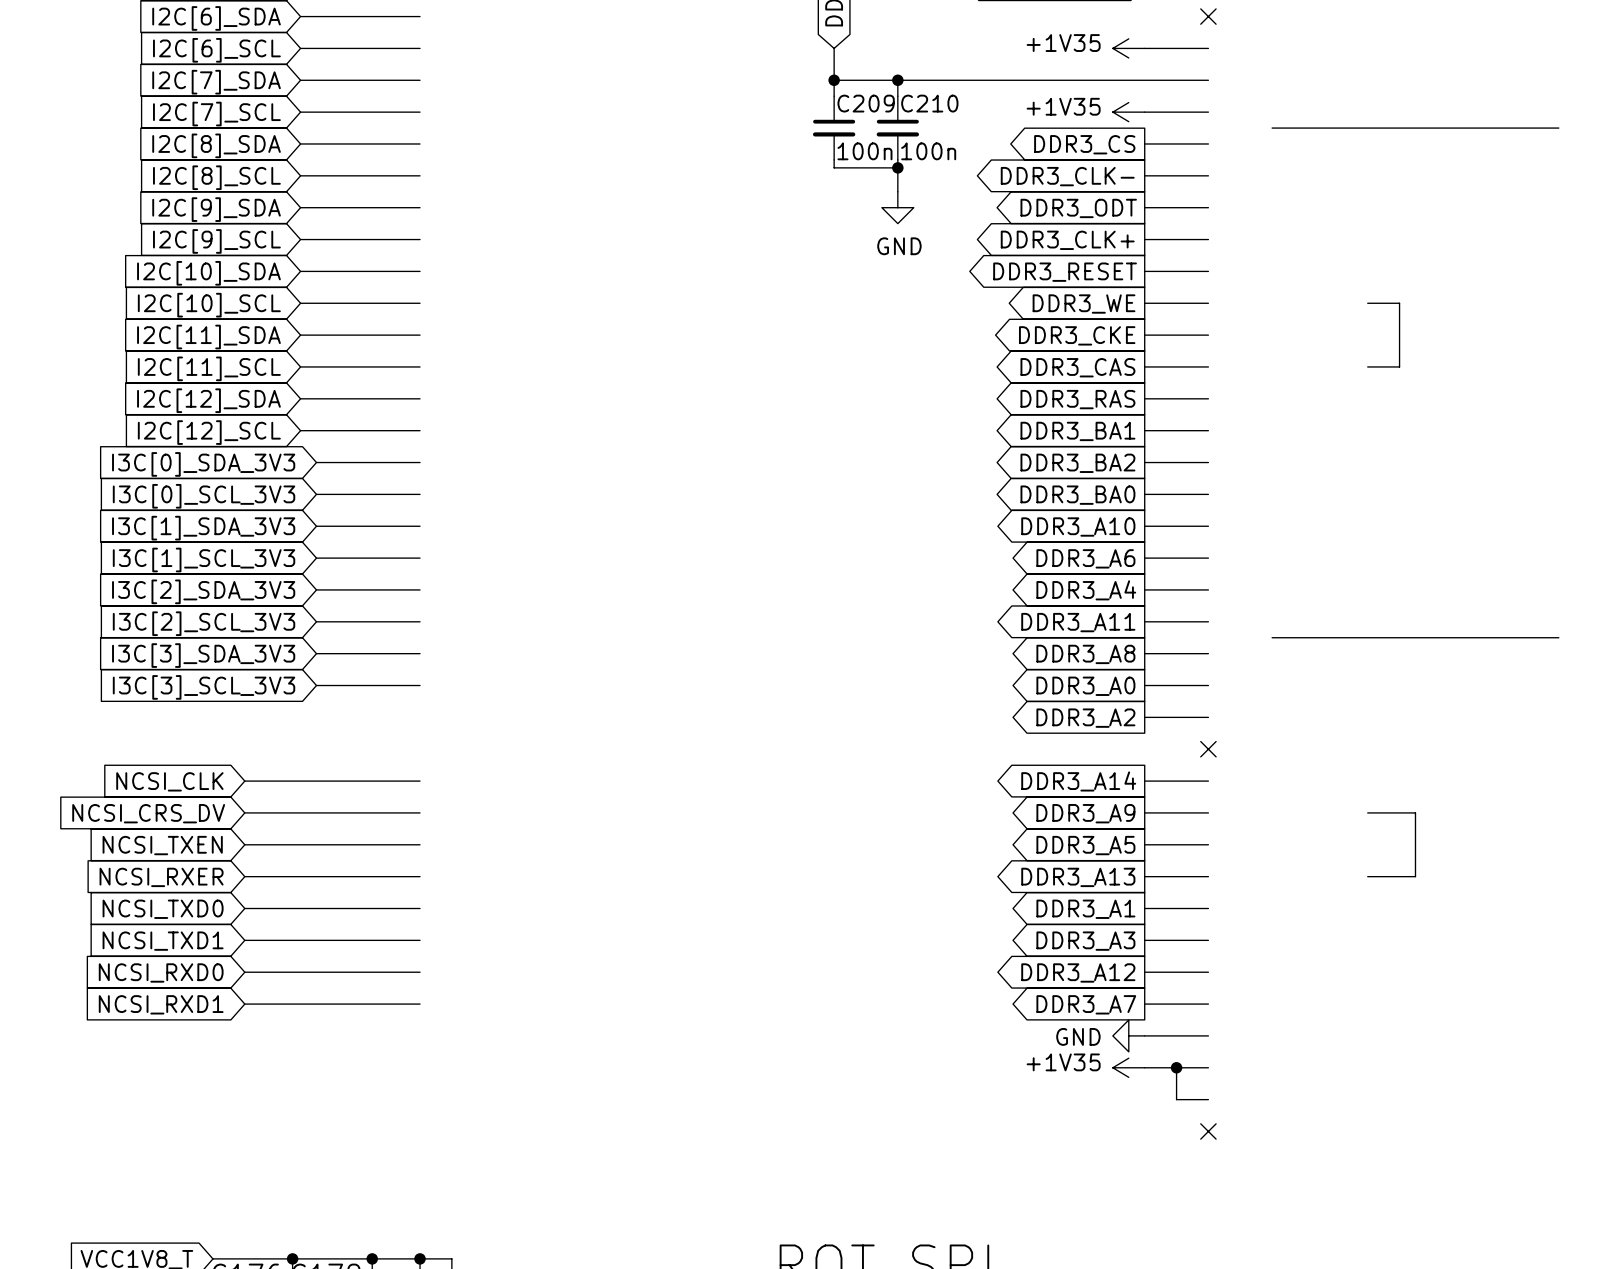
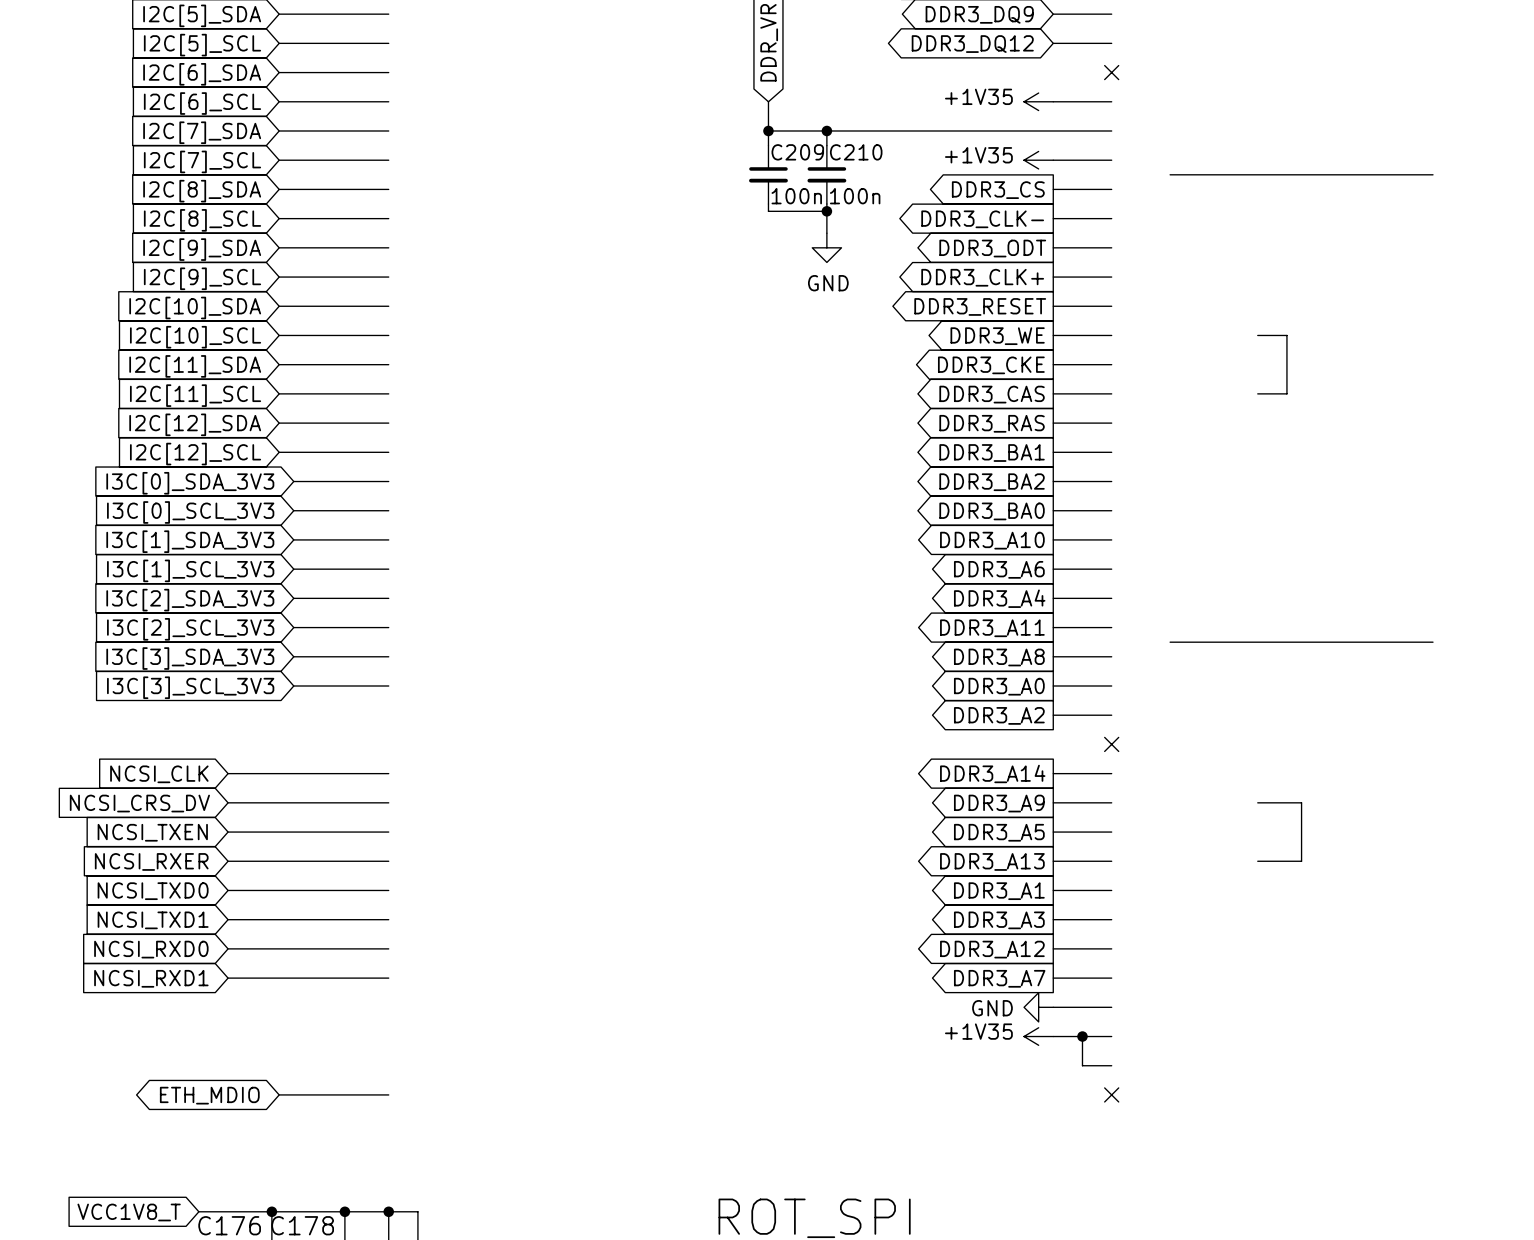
wire: none -> (279, 1094) (388, 1094)
global label: none -> ETH_MDIO (209, 1095)

